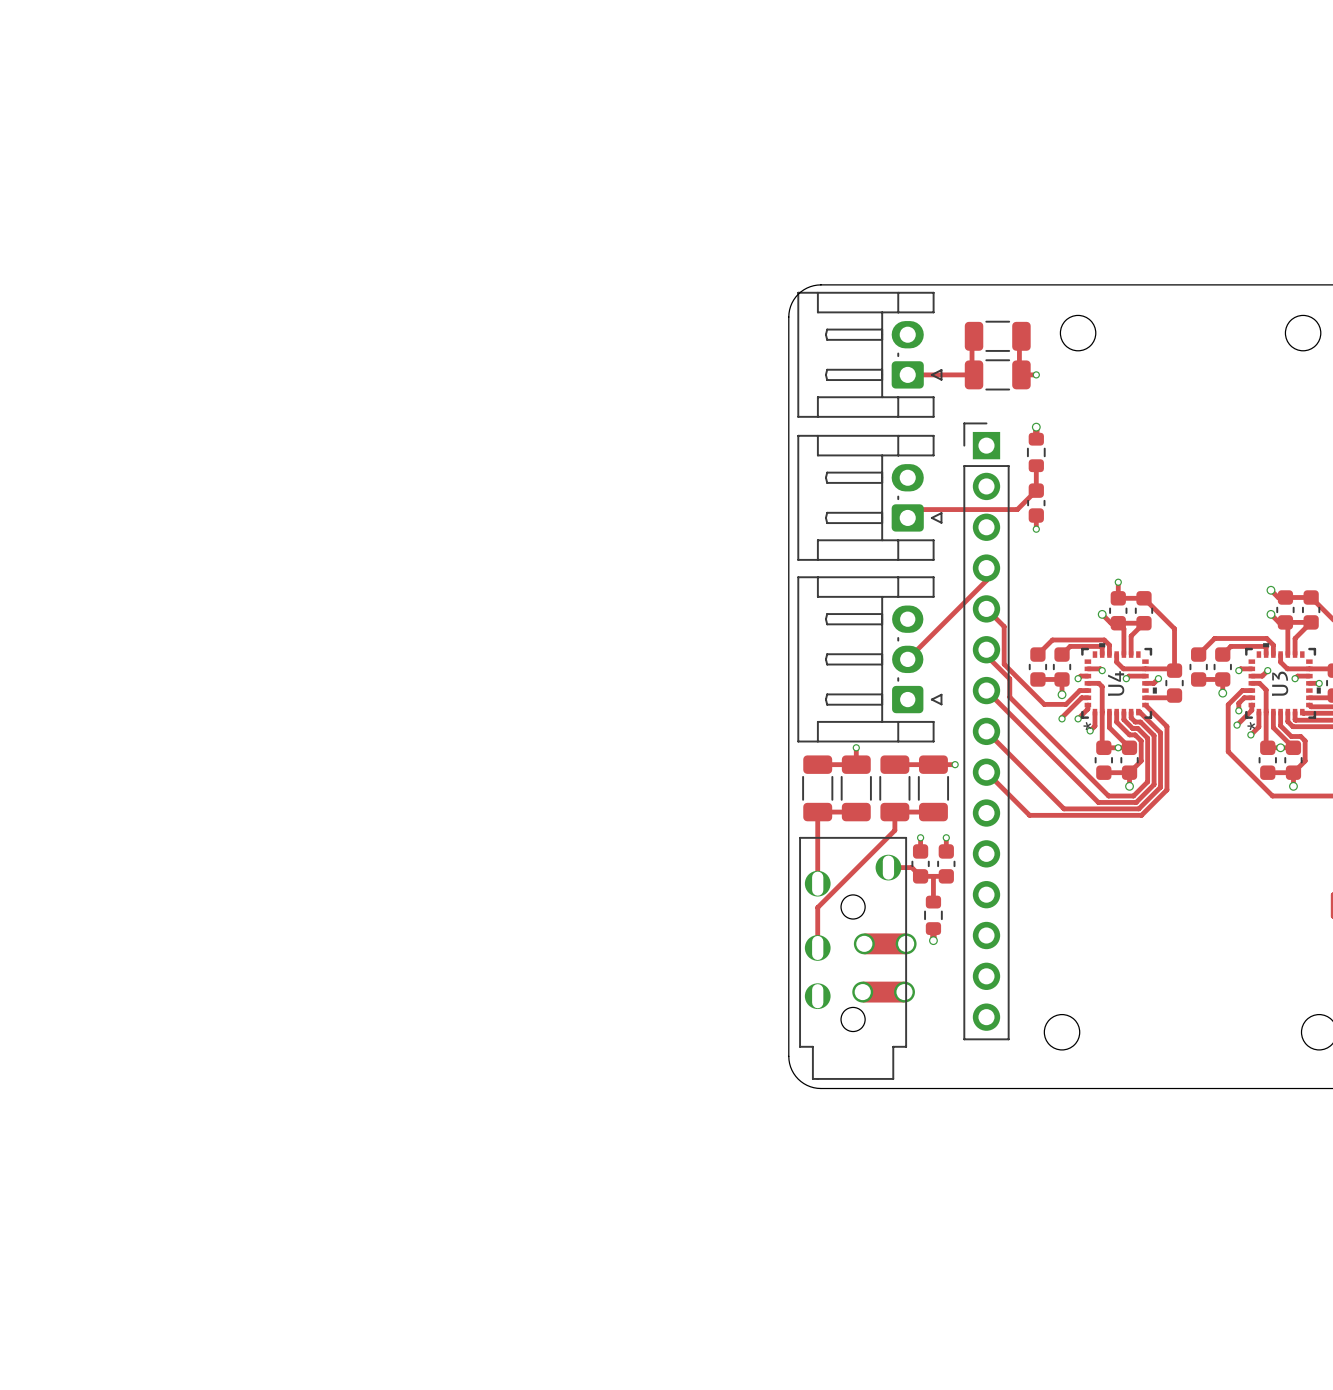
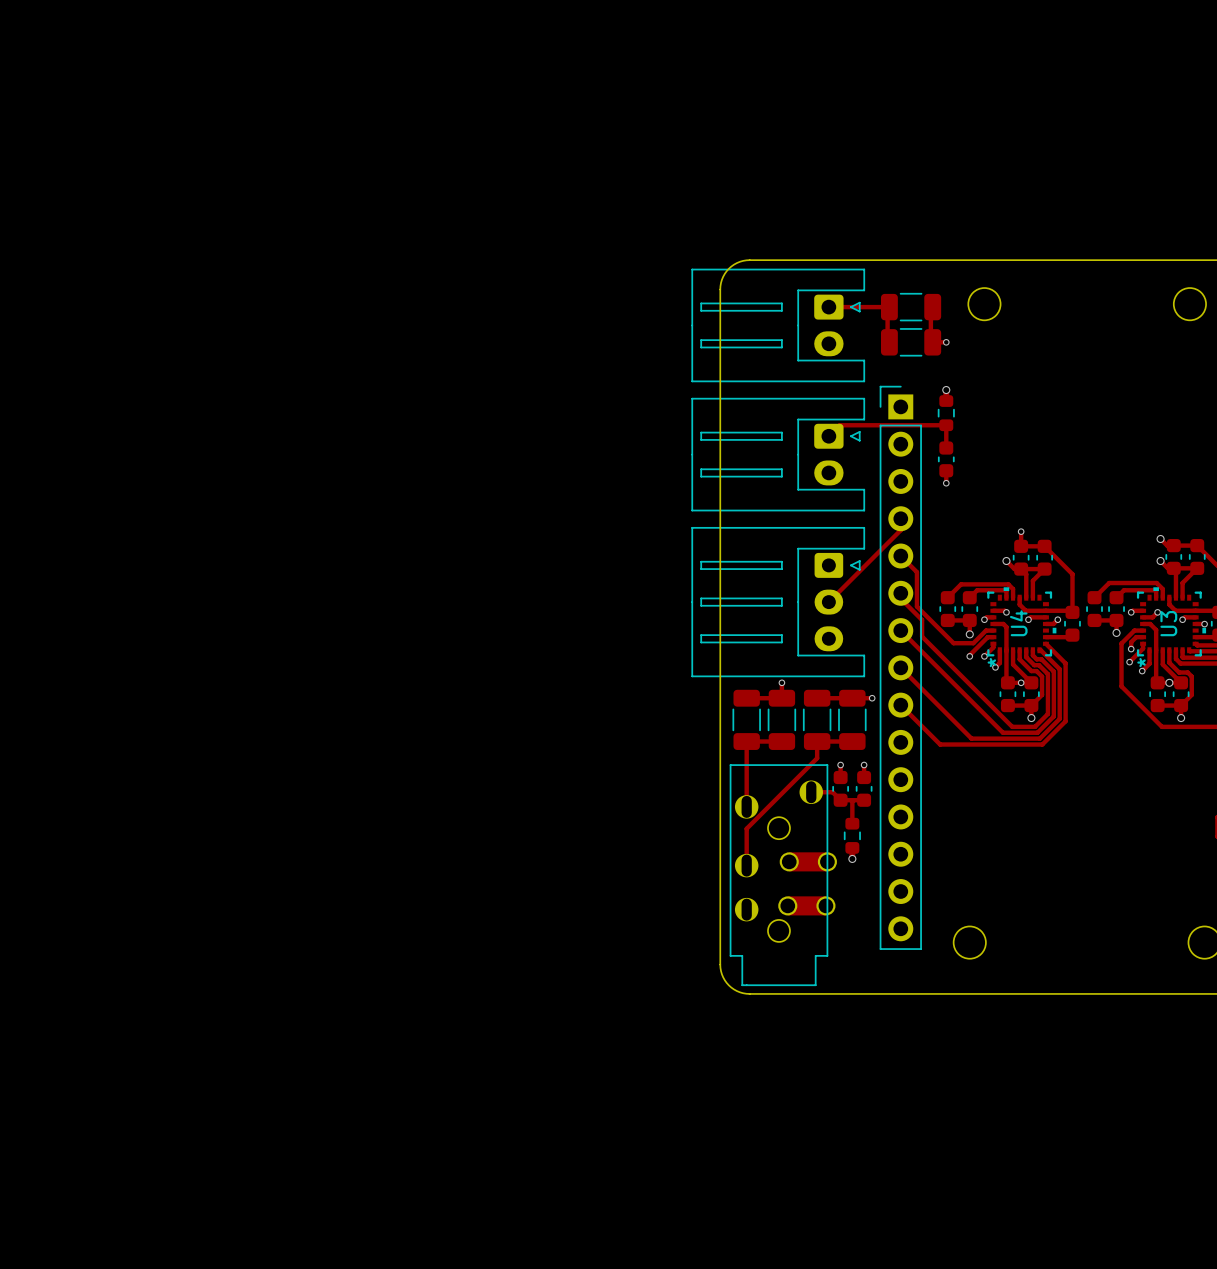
track: none -> (828, 307) (887, 307)
part: (869, 354) -> none
part: none -> (778, 325)
track: (974, 374) (914, 374) (907, 381) -> none
track: none -> (946, 425) (839, 425) (828, 436)
track: (1036, 490) (1017, 509) (916, 509) (907, 517) -> none
part: none -> (778, 454)
part: (869, 497) -> none
part: none -> (778, 602)
part: (869, 659) -> none

